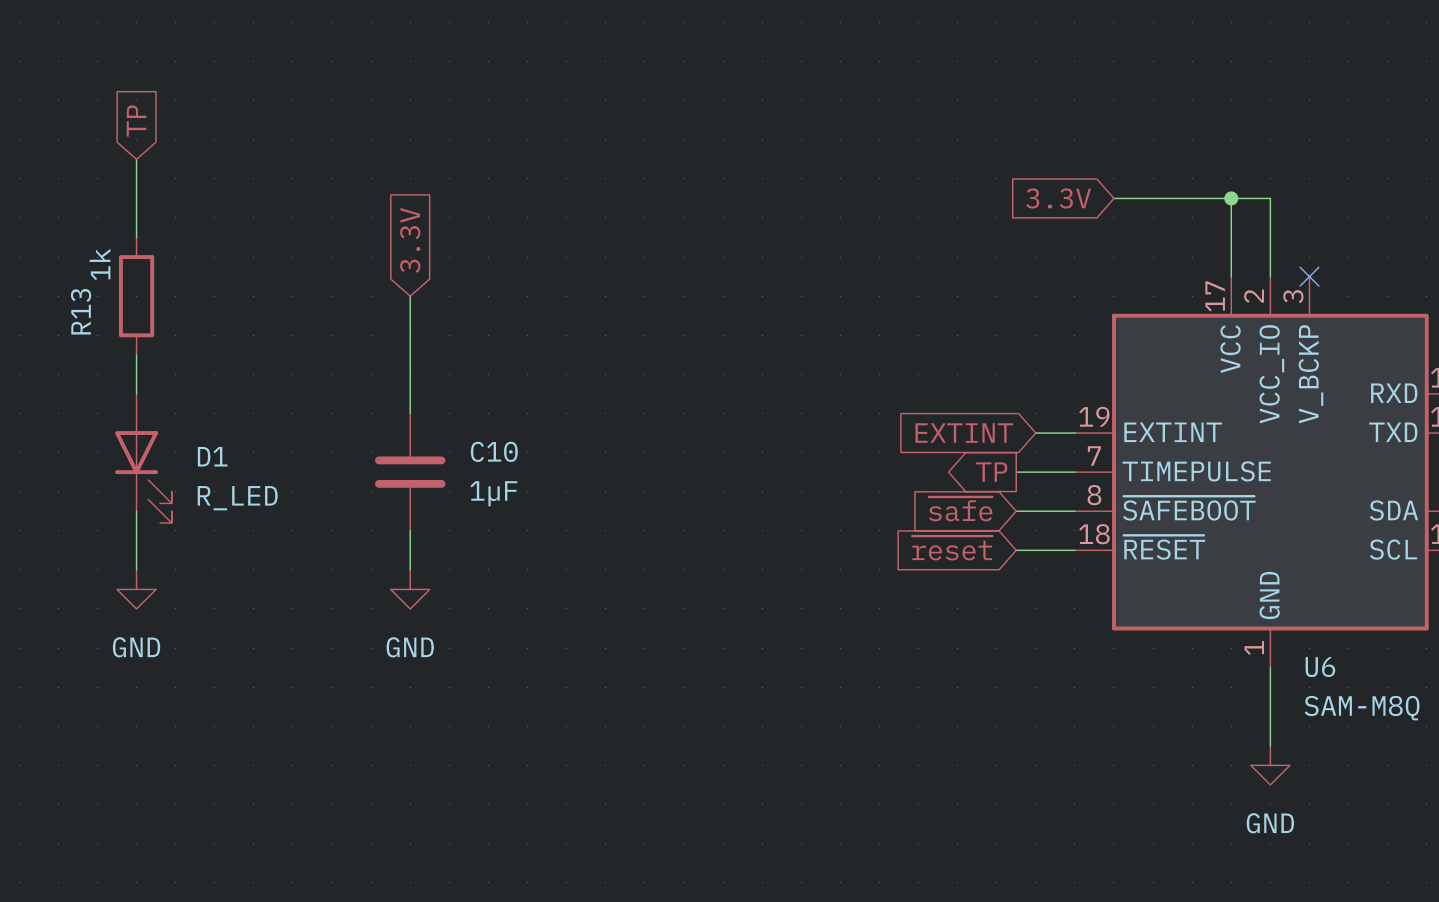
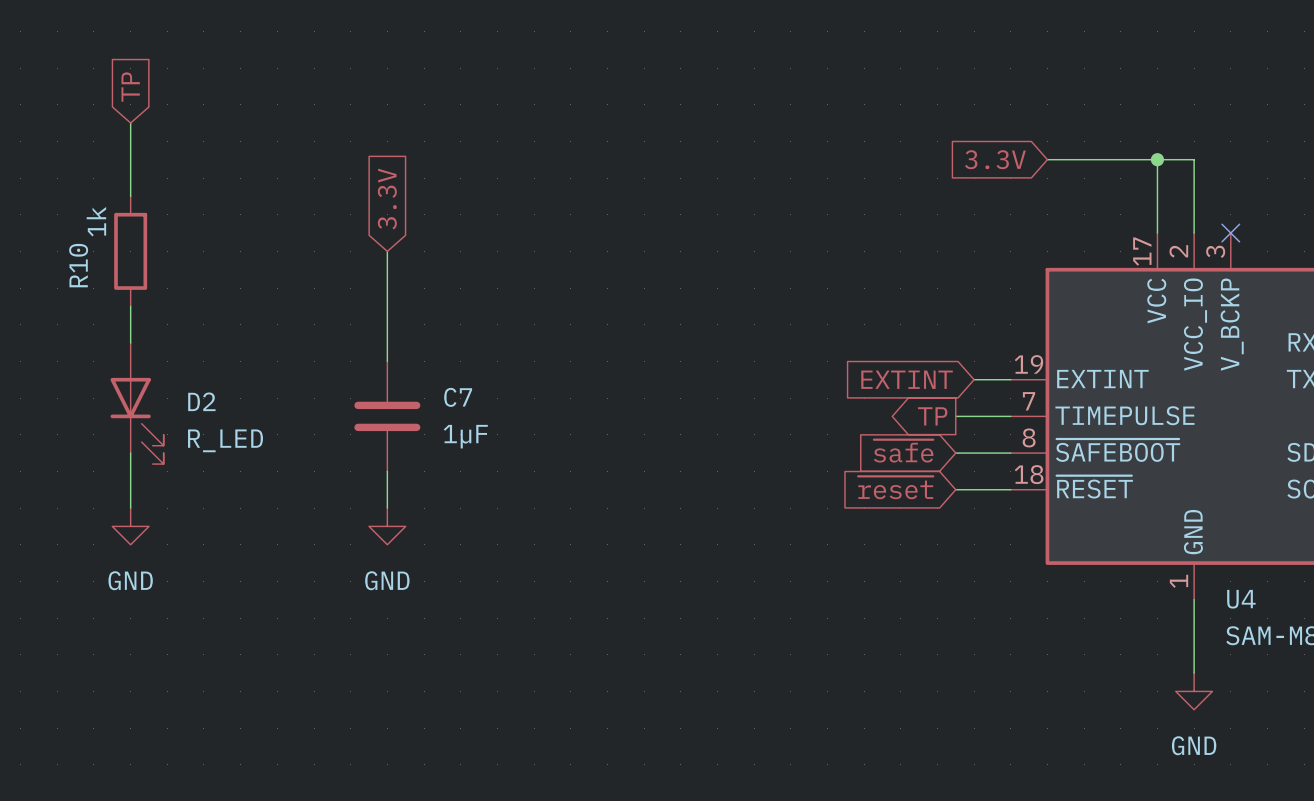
R13 name: R13 (81, 311) -> R10 (78, 265)
C10 name: C10 (494, 451) -> C7 (458, 397)
D1 name: D1 (212, 456) -> D2 (201, 401)
U6 name: U6 (1320, 667) -> U4 (1241, 599)

